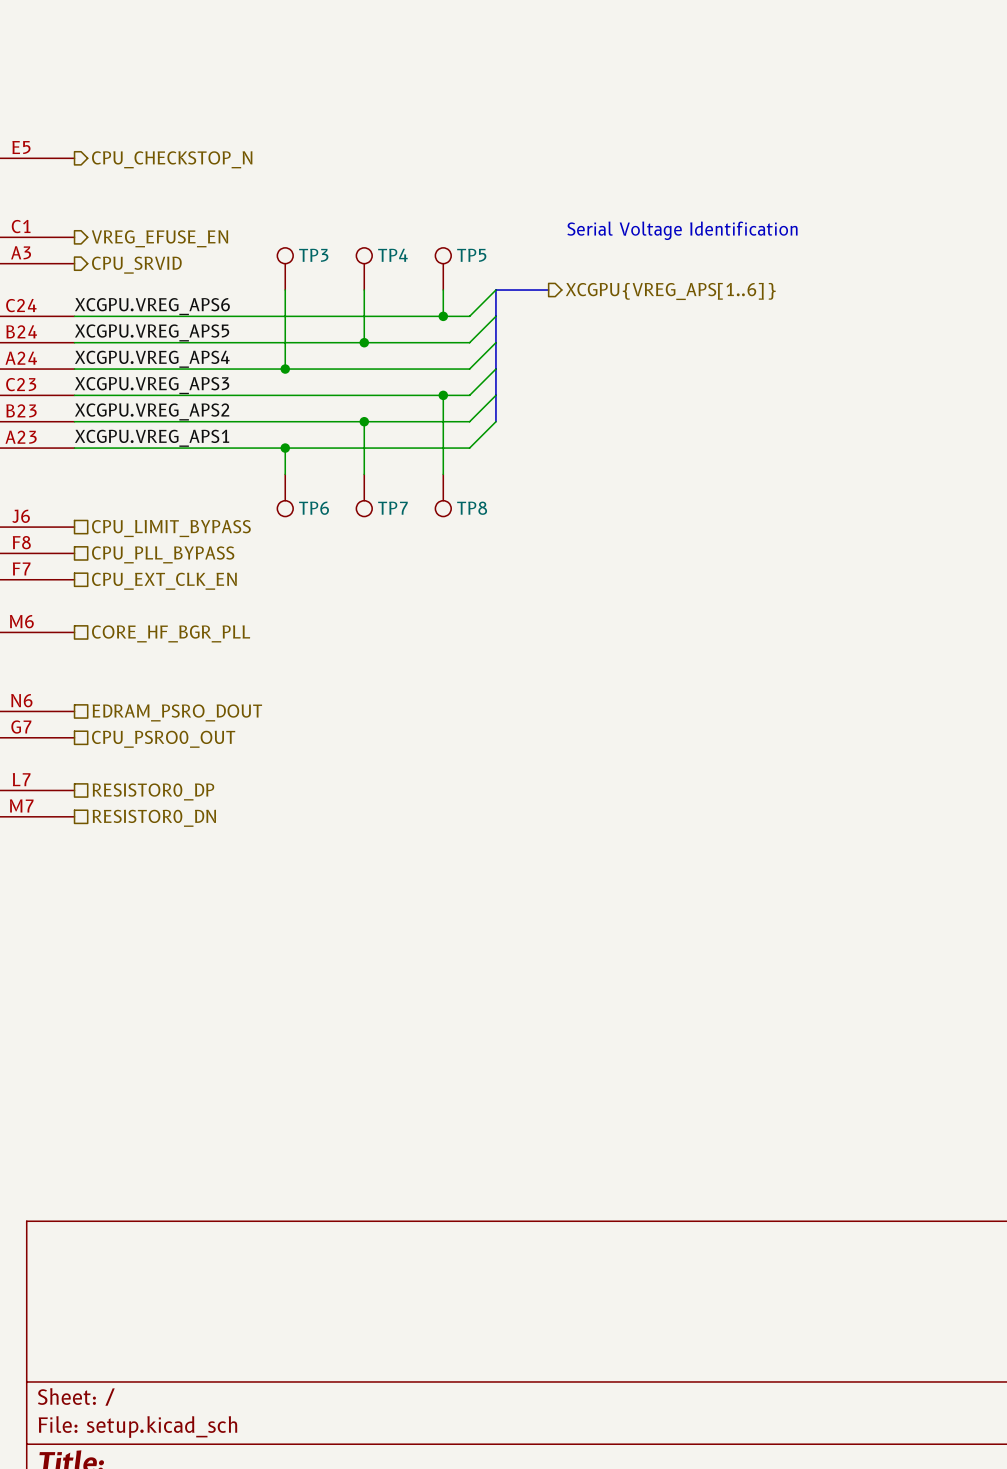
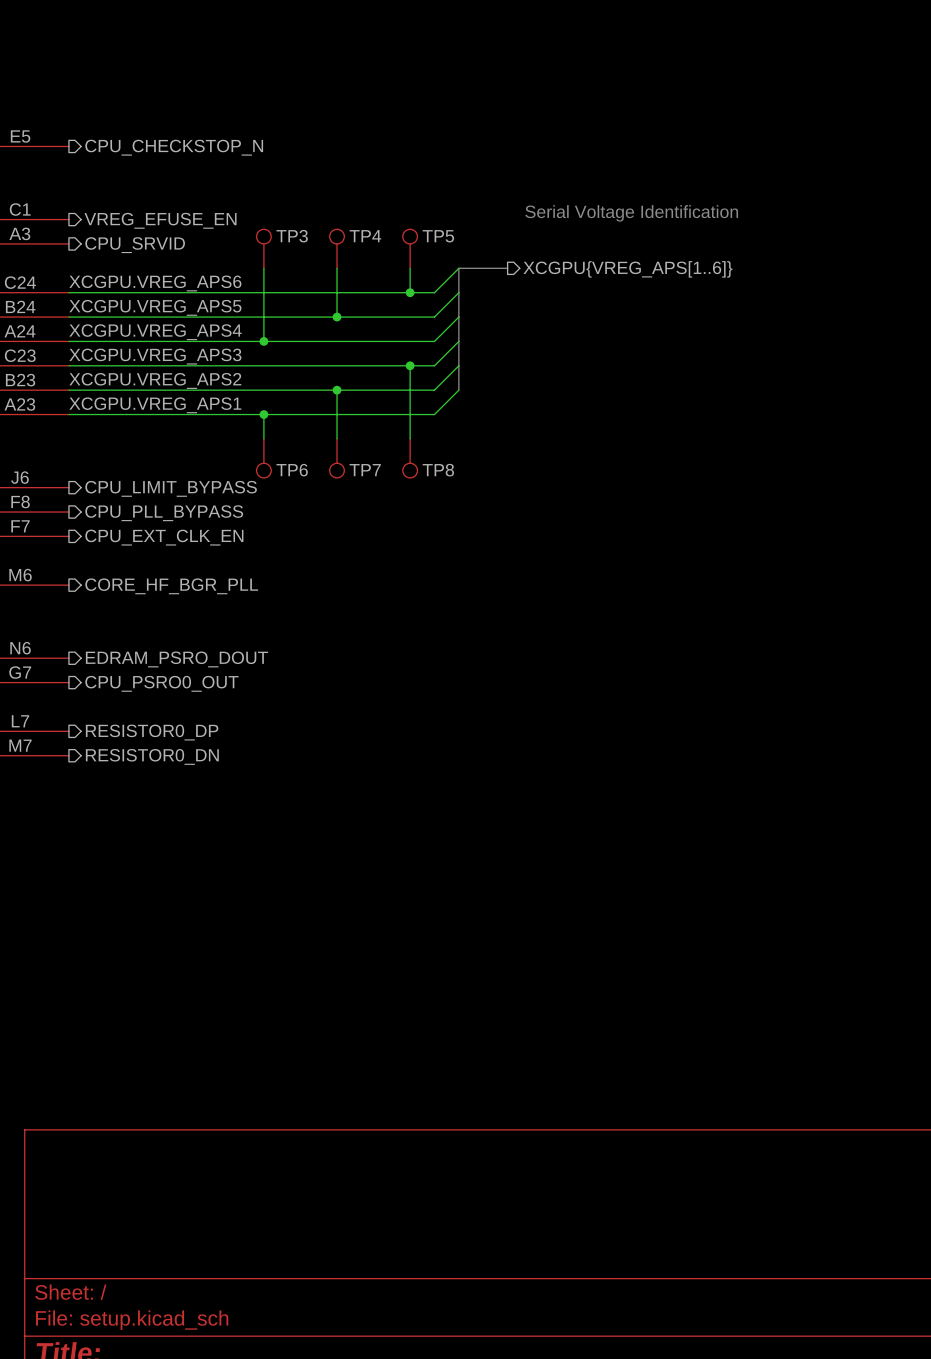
hierarchical label shape: passive (171, 528) -> output (171, 488)
hierarchical label shape: passive (163, 554) -> output (164, 513)
hierarchical label shape: passive (164, 581) -> output (164, 537)
hierarchical label shape: passive (171, 633) -> output (171, 586)
hierarchical label shape: passive (177, 712) -> output (176, 659)
hierarchical label shape: passive (163, 739) -> output (161, 683)
hierarchical label shape: passive (153, 791) -> output (152, 732)
hierarchical label shape: passive (154, 818) -> output (152, 756)

